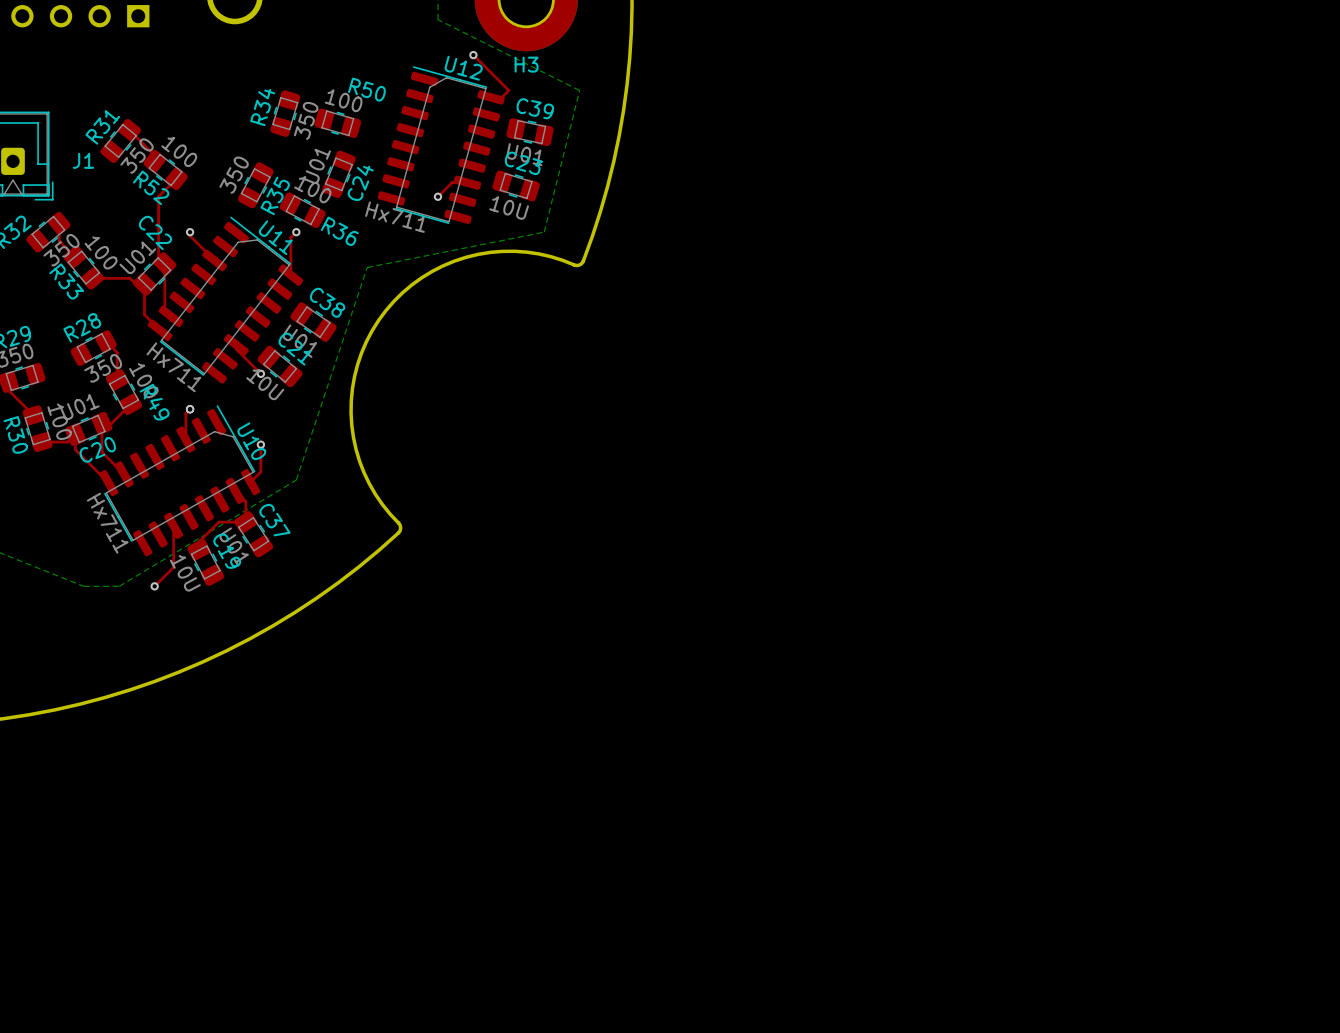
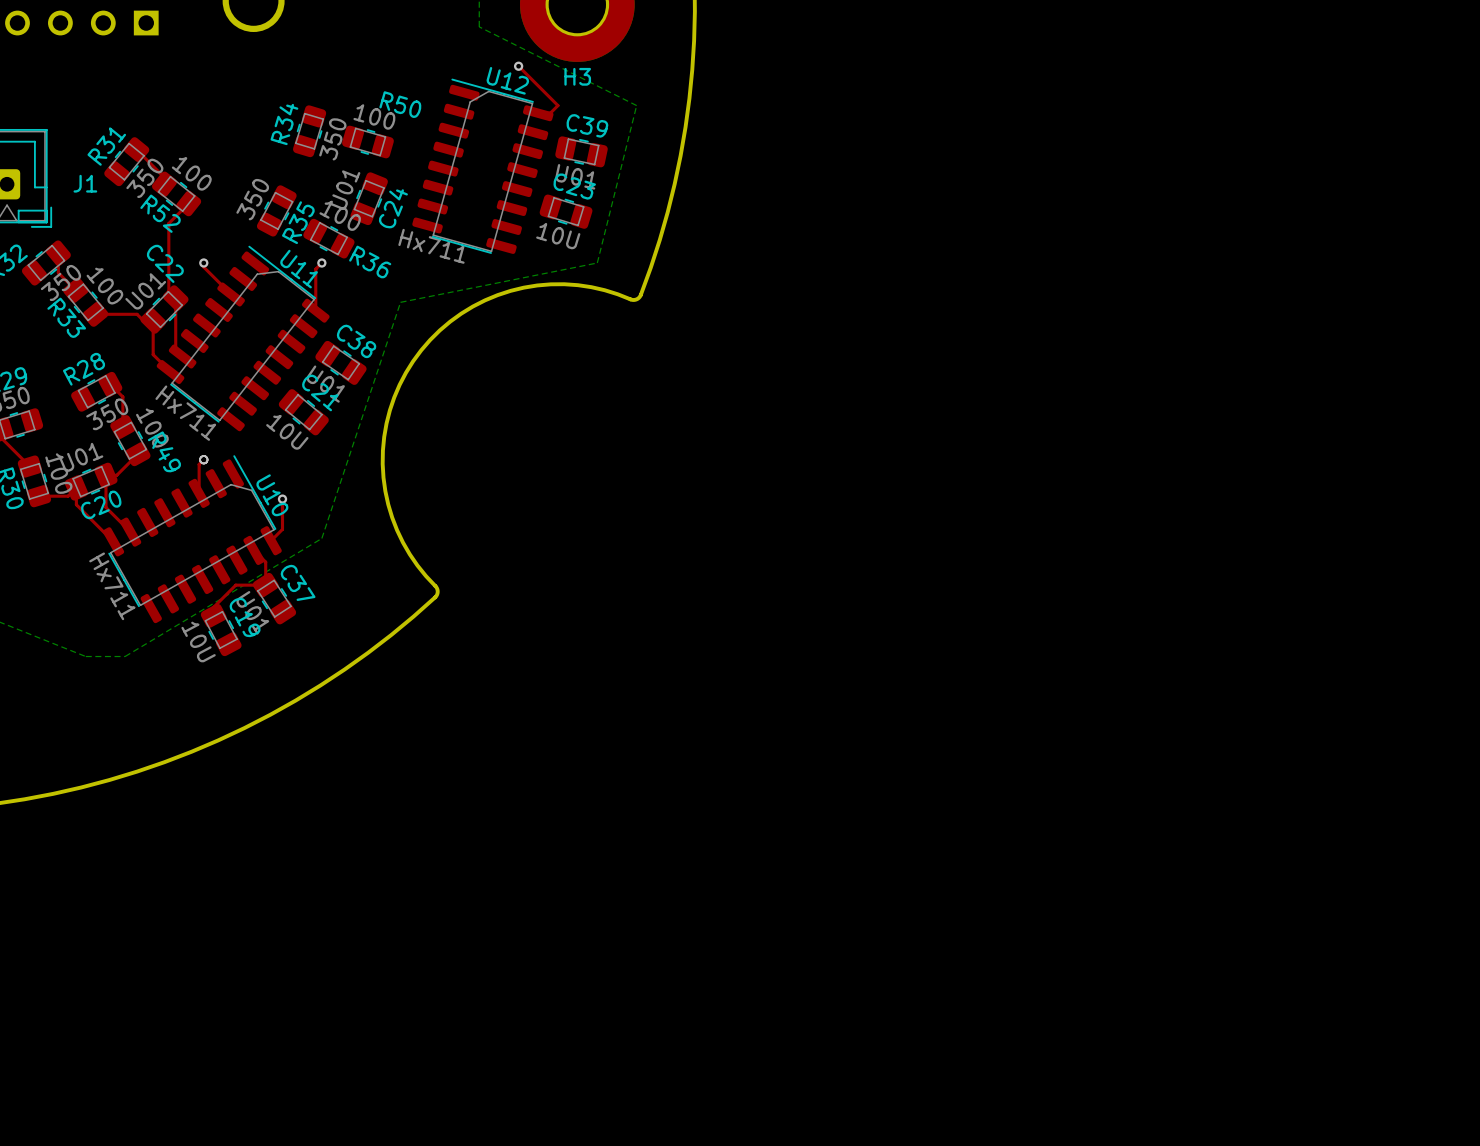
top track: (467, 182) (452, 182) (437, 196) -> none
via: (437, 196) -> none
top track: (236, 344) (236, 349) (260, 373) -> none
via: (260, 373) -> none
top track: (173, 525) (173, 567) (154, 586) -> none
via: (154, 586) -> none

